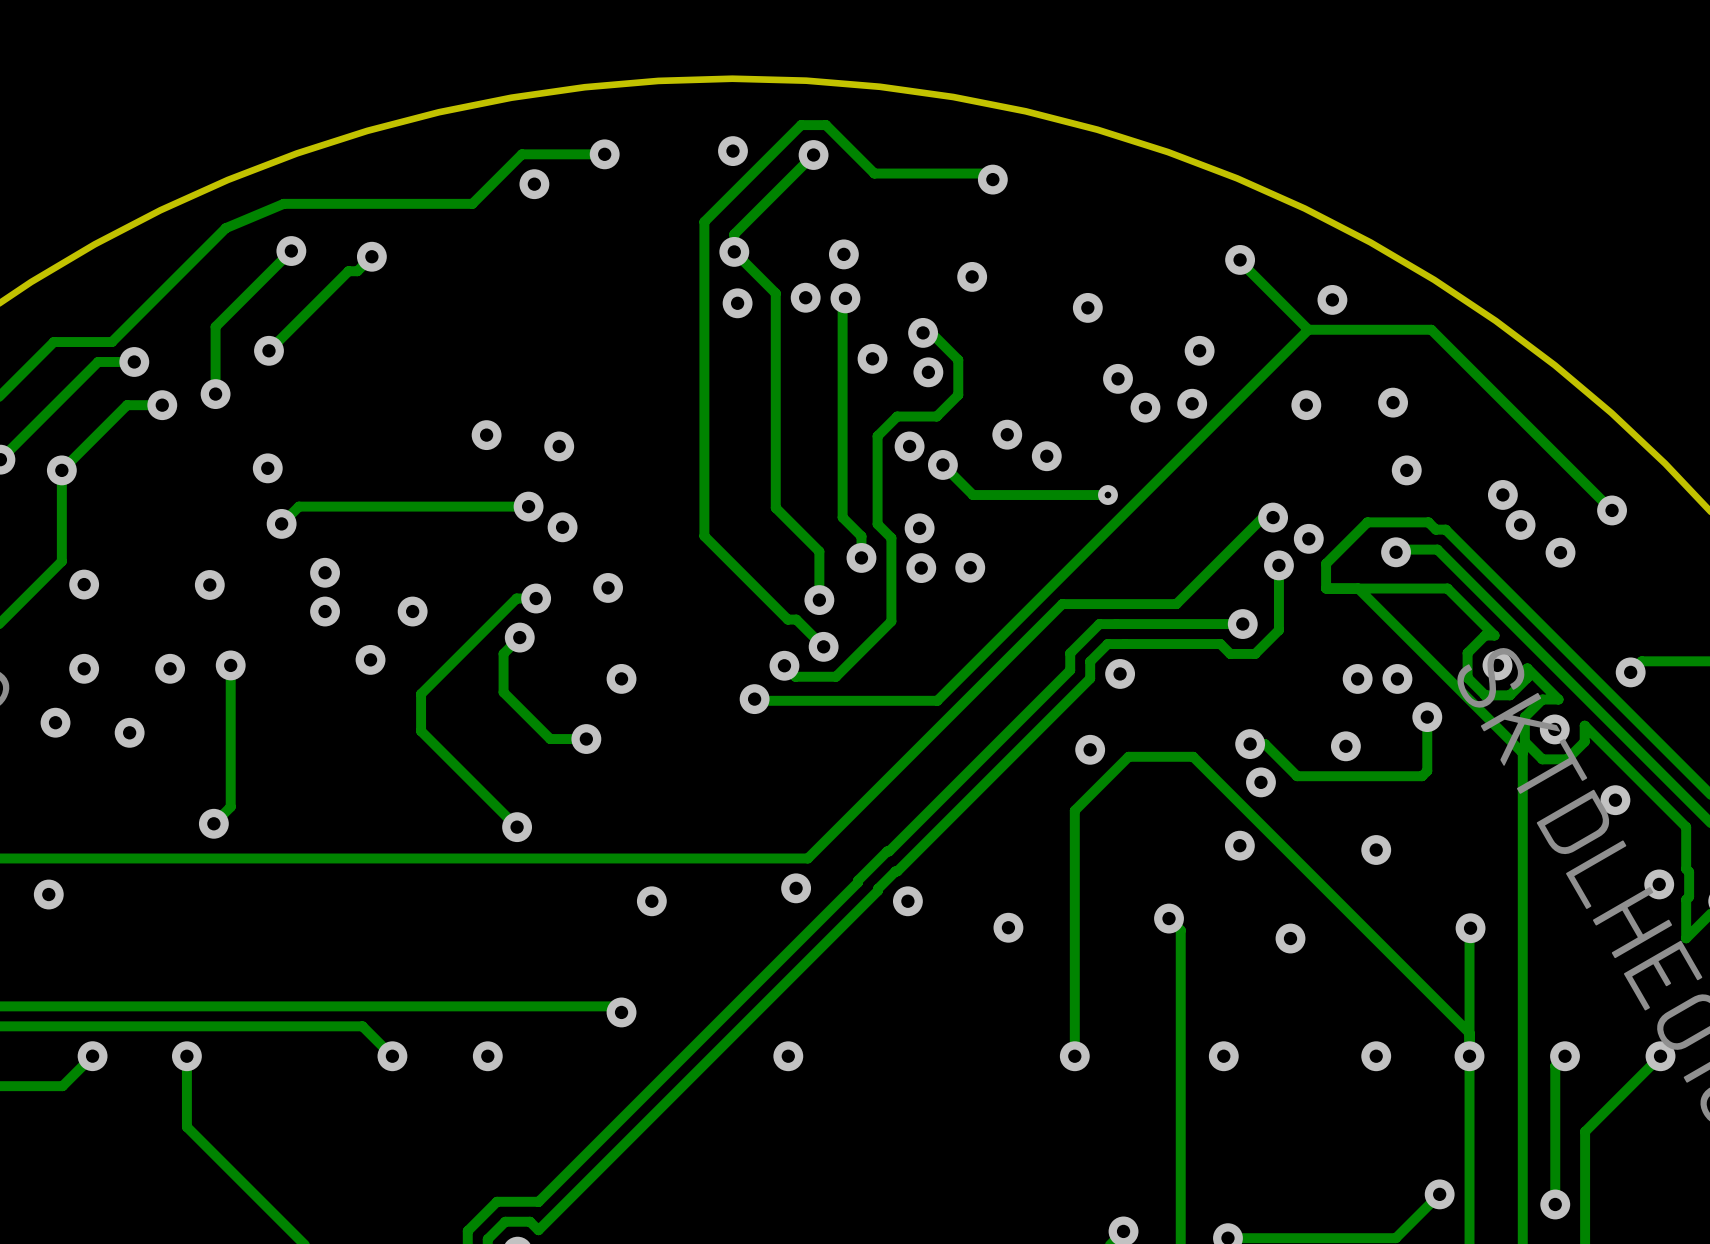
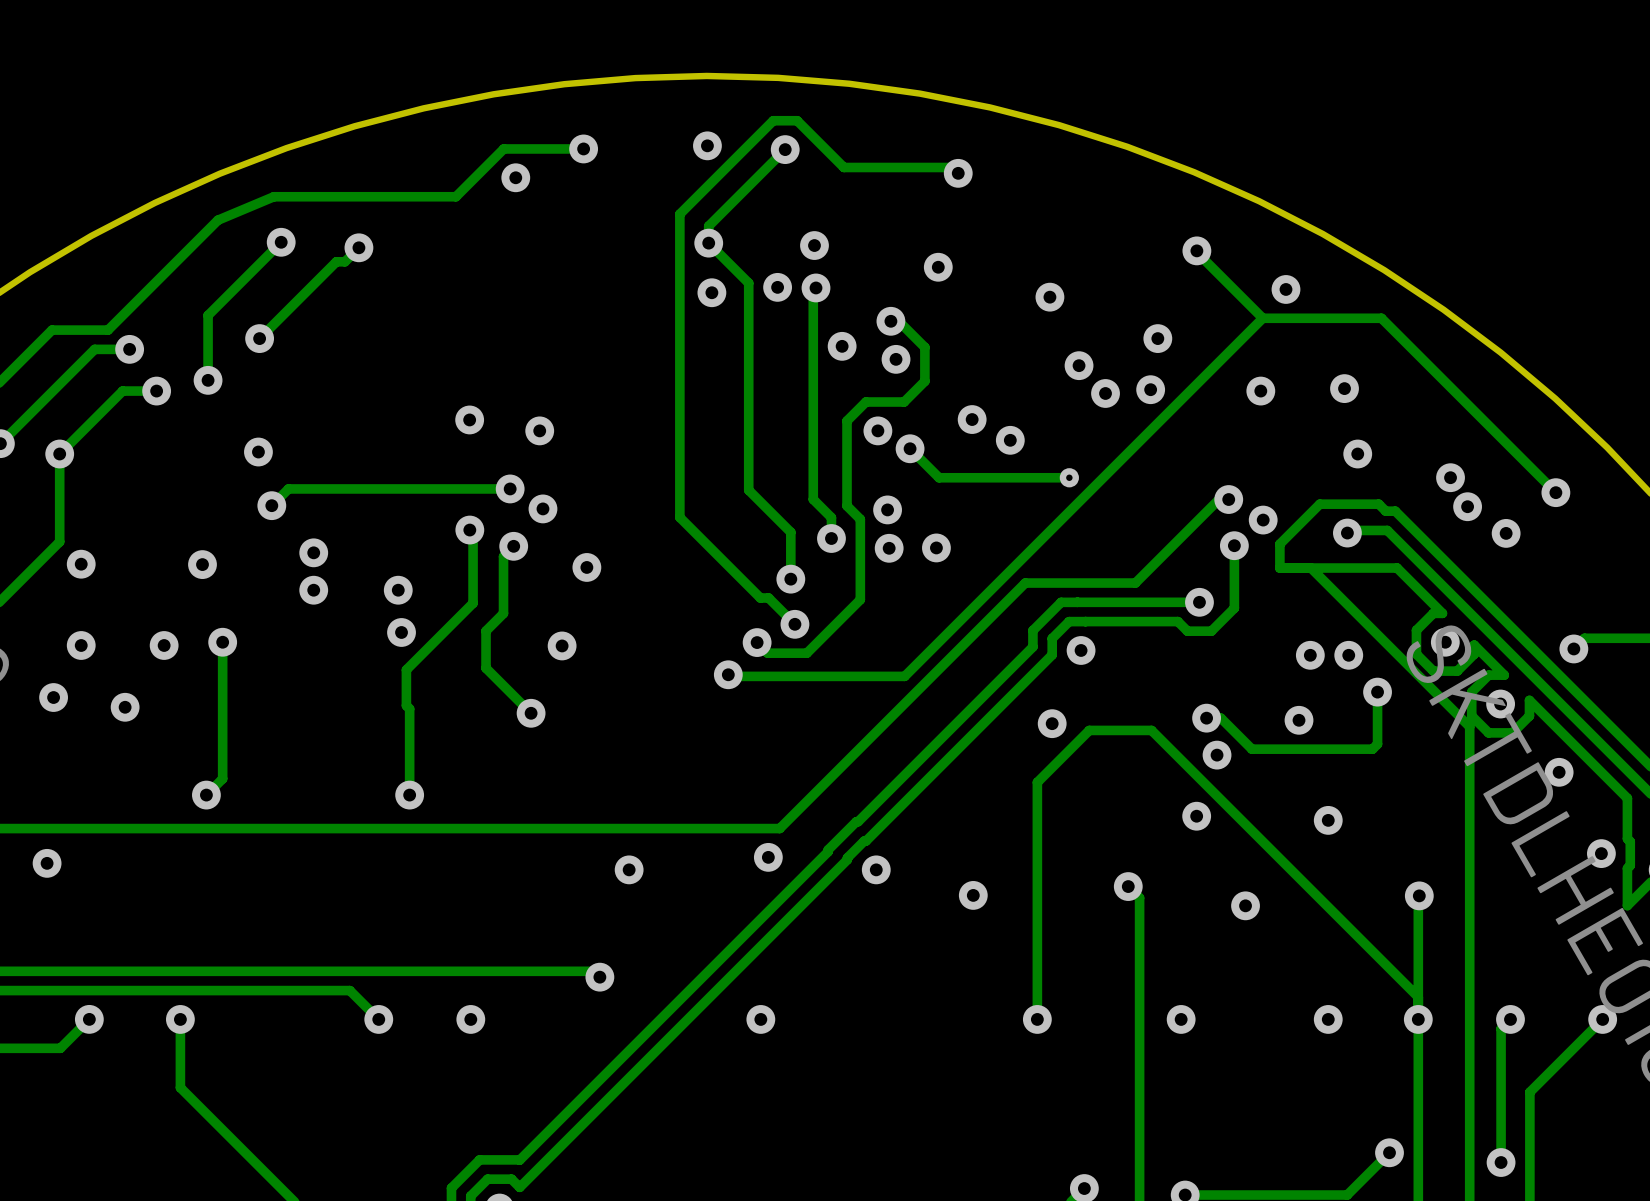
via: none -> (469, 530)
track: none -> (513, 546) (503, 556) (503, 613) (501, 615)
track: (536, 598) (516, 598) (490, 625) -> (469, 530) (473, 533) (473, 603)
via position: (536, 598) -> (513, 546)
via: (519, 637) -> none
via position: (370, 659) -> (401, 632)
via: none -> (562, 645)
via: (621, 678) -> none
track: (424, 734) (517, 827) -> (409, 708) (409, 795)
via: none -> (531, 713)
track: (586, 739) (550, 739) -> none
via: (586, 739) -> none
via: none -> (409, 795)
via: (517, 827) -> none

